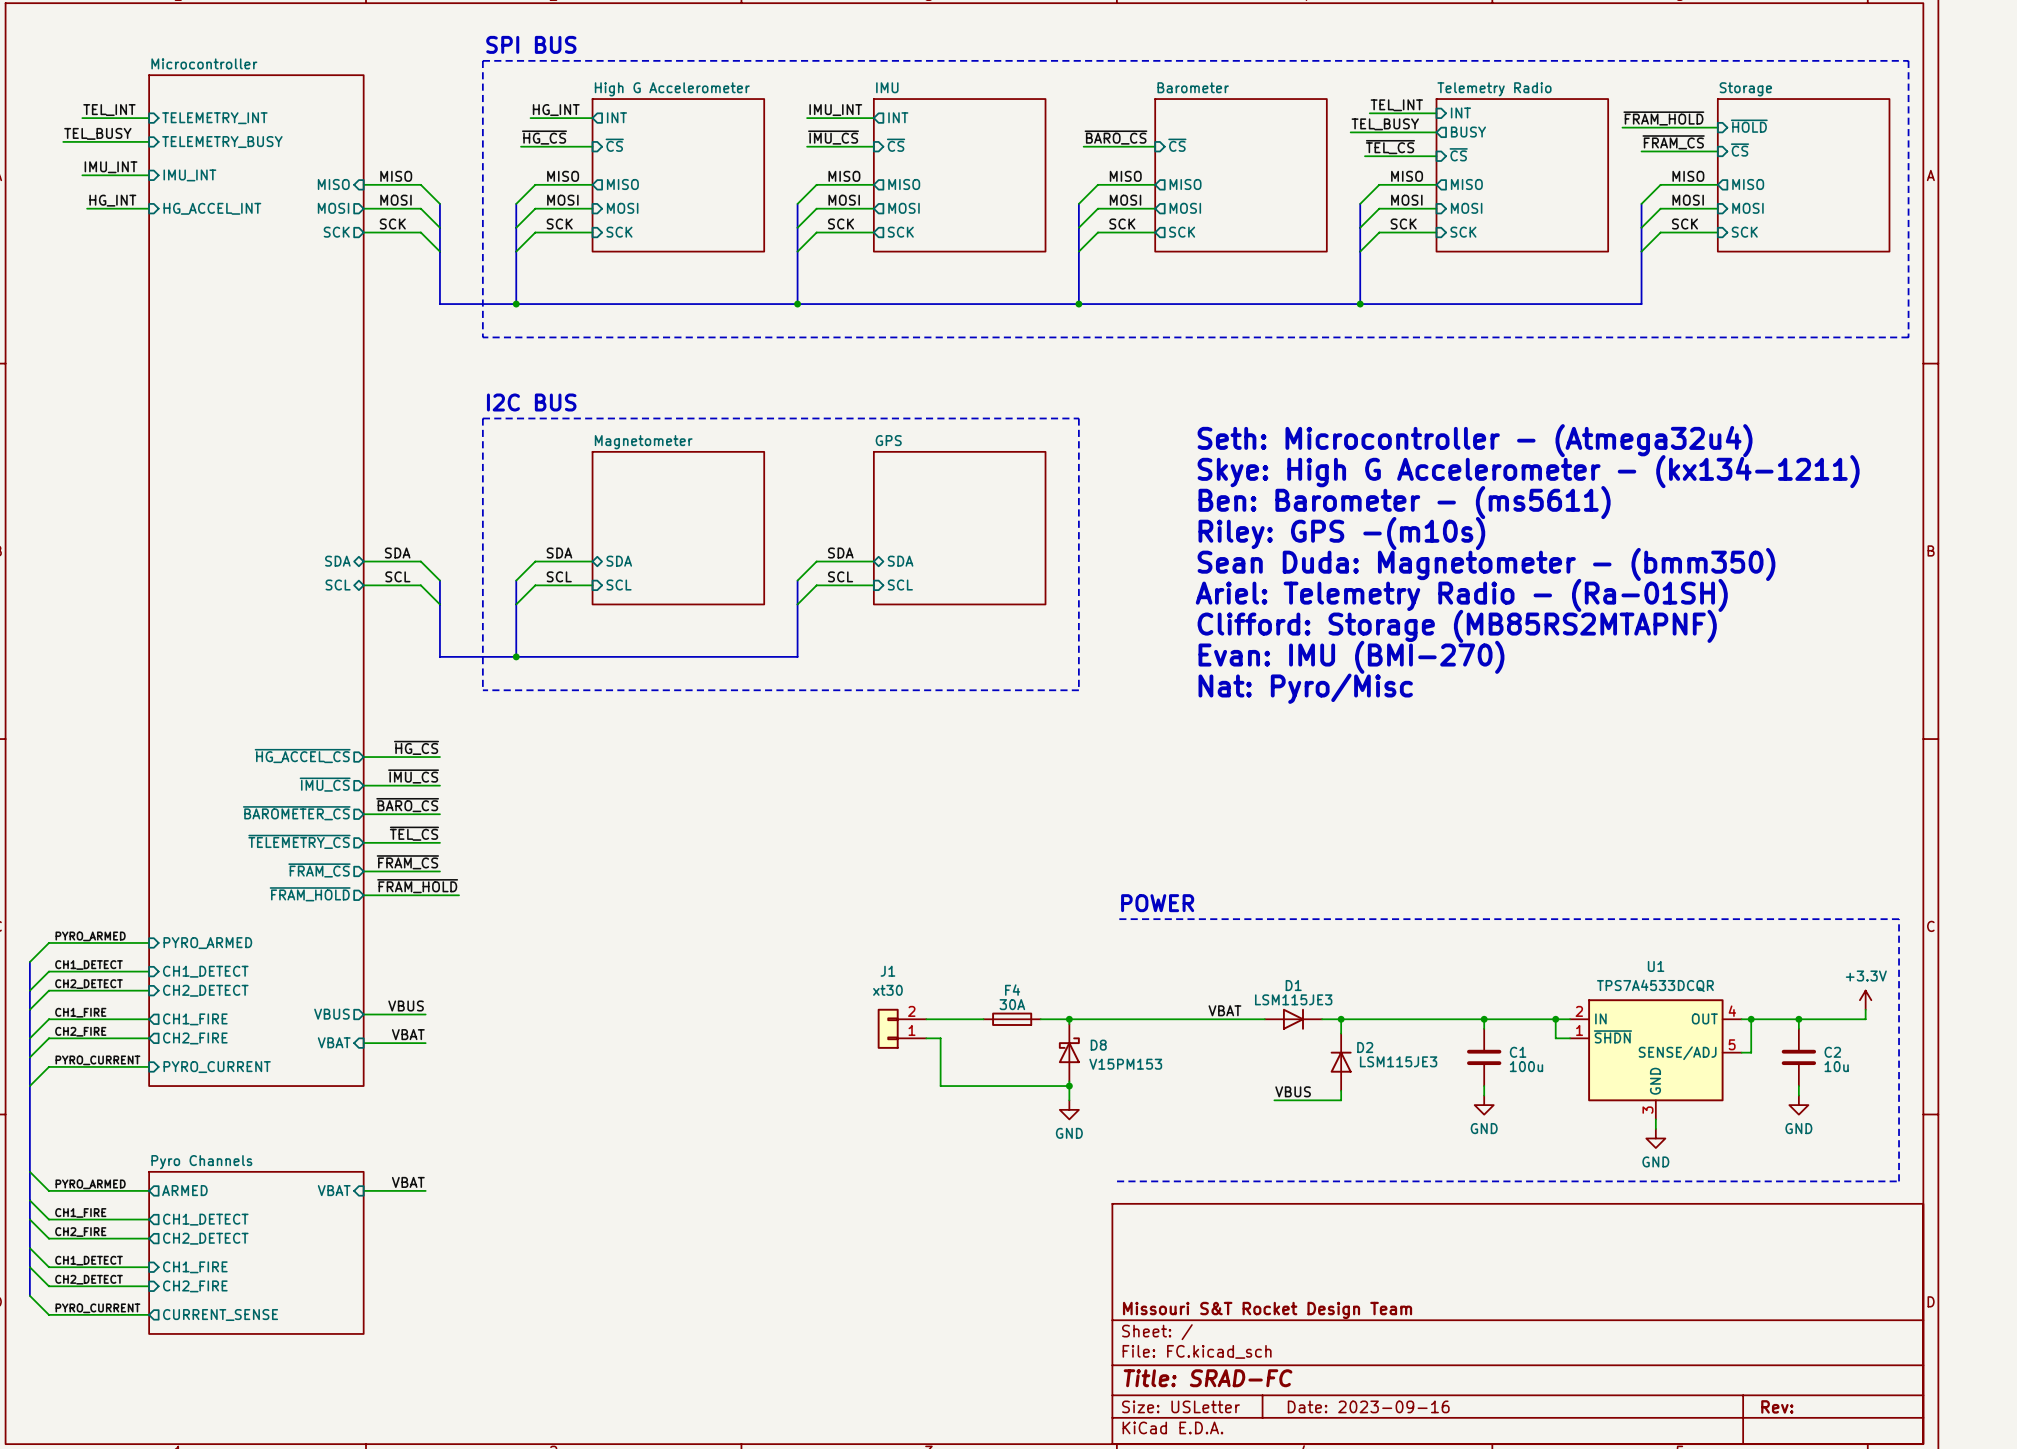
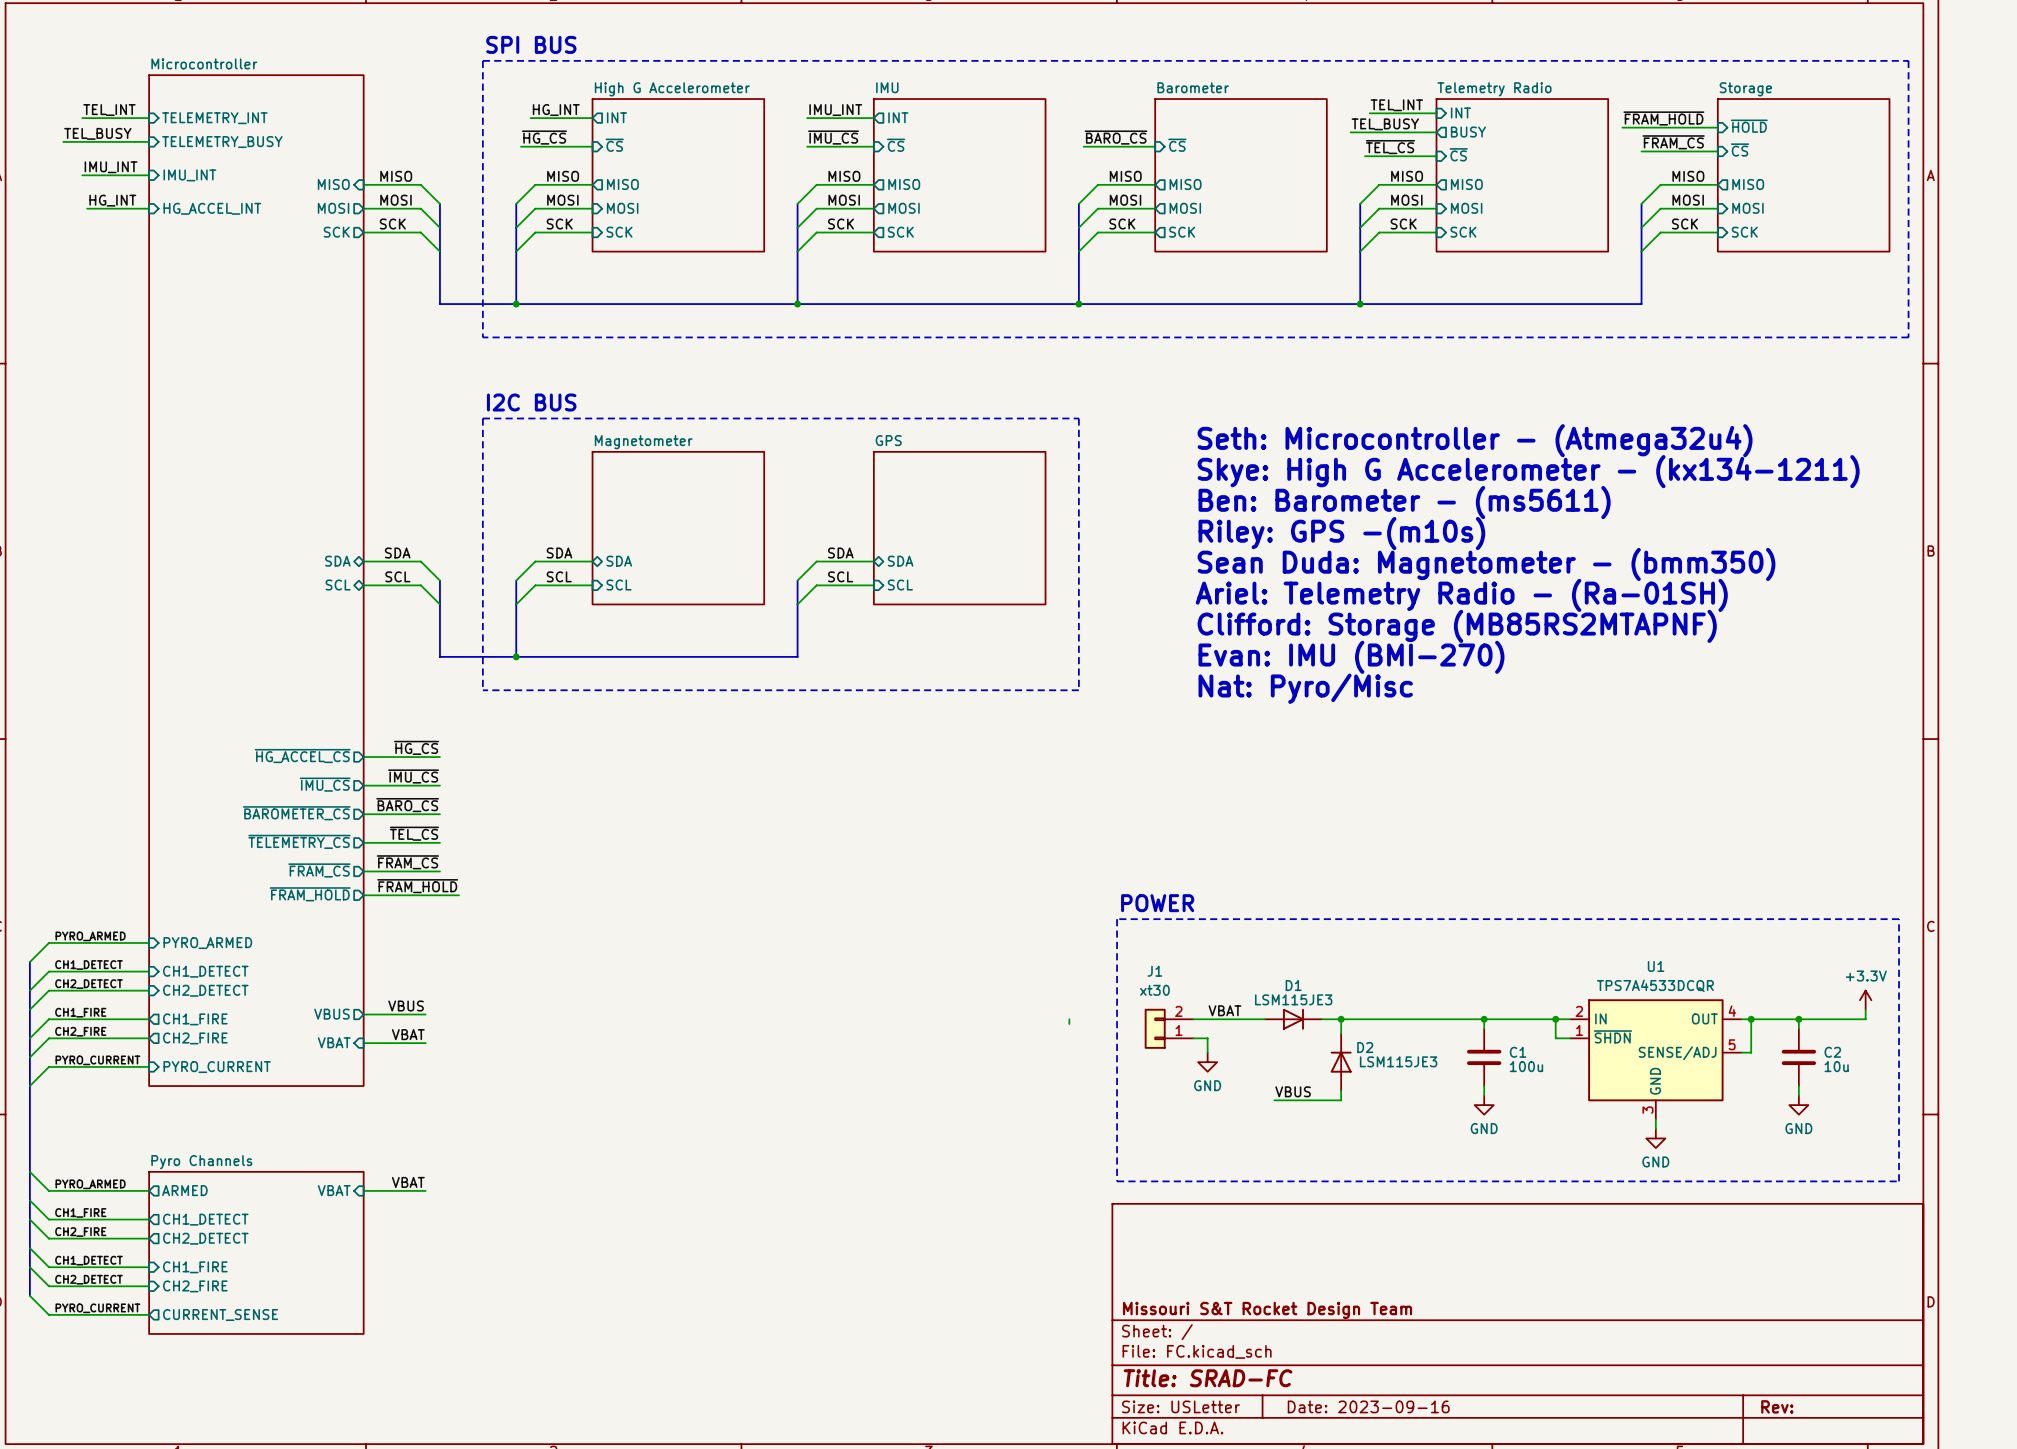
line: none -> (1117, 919) (1117, 1181)
wire: (926, 1019) (983, 1019) -> none
F4: 30A (1012, 1019) -> none
wire: (1040, 1019) (1193, 1019) -> none
junction: (1069, 1019) -> none
J1 position: (902, 1028) -> (1169, 1028)
wire: (926, 1038) (940, 1038) (940, 1086) (1069, 1086) -> none
wire: none -> (1193, 1038) (1207, 1038) (1207, 1052)
D8: V15PM153 (1069, 1052) -> none
wire: (1069, 1081) (1069, 1100) -> none
junction: (1069, 1086) -> none
power symbol position: GND (1069, 1109) -> GND (1207, 1062)

